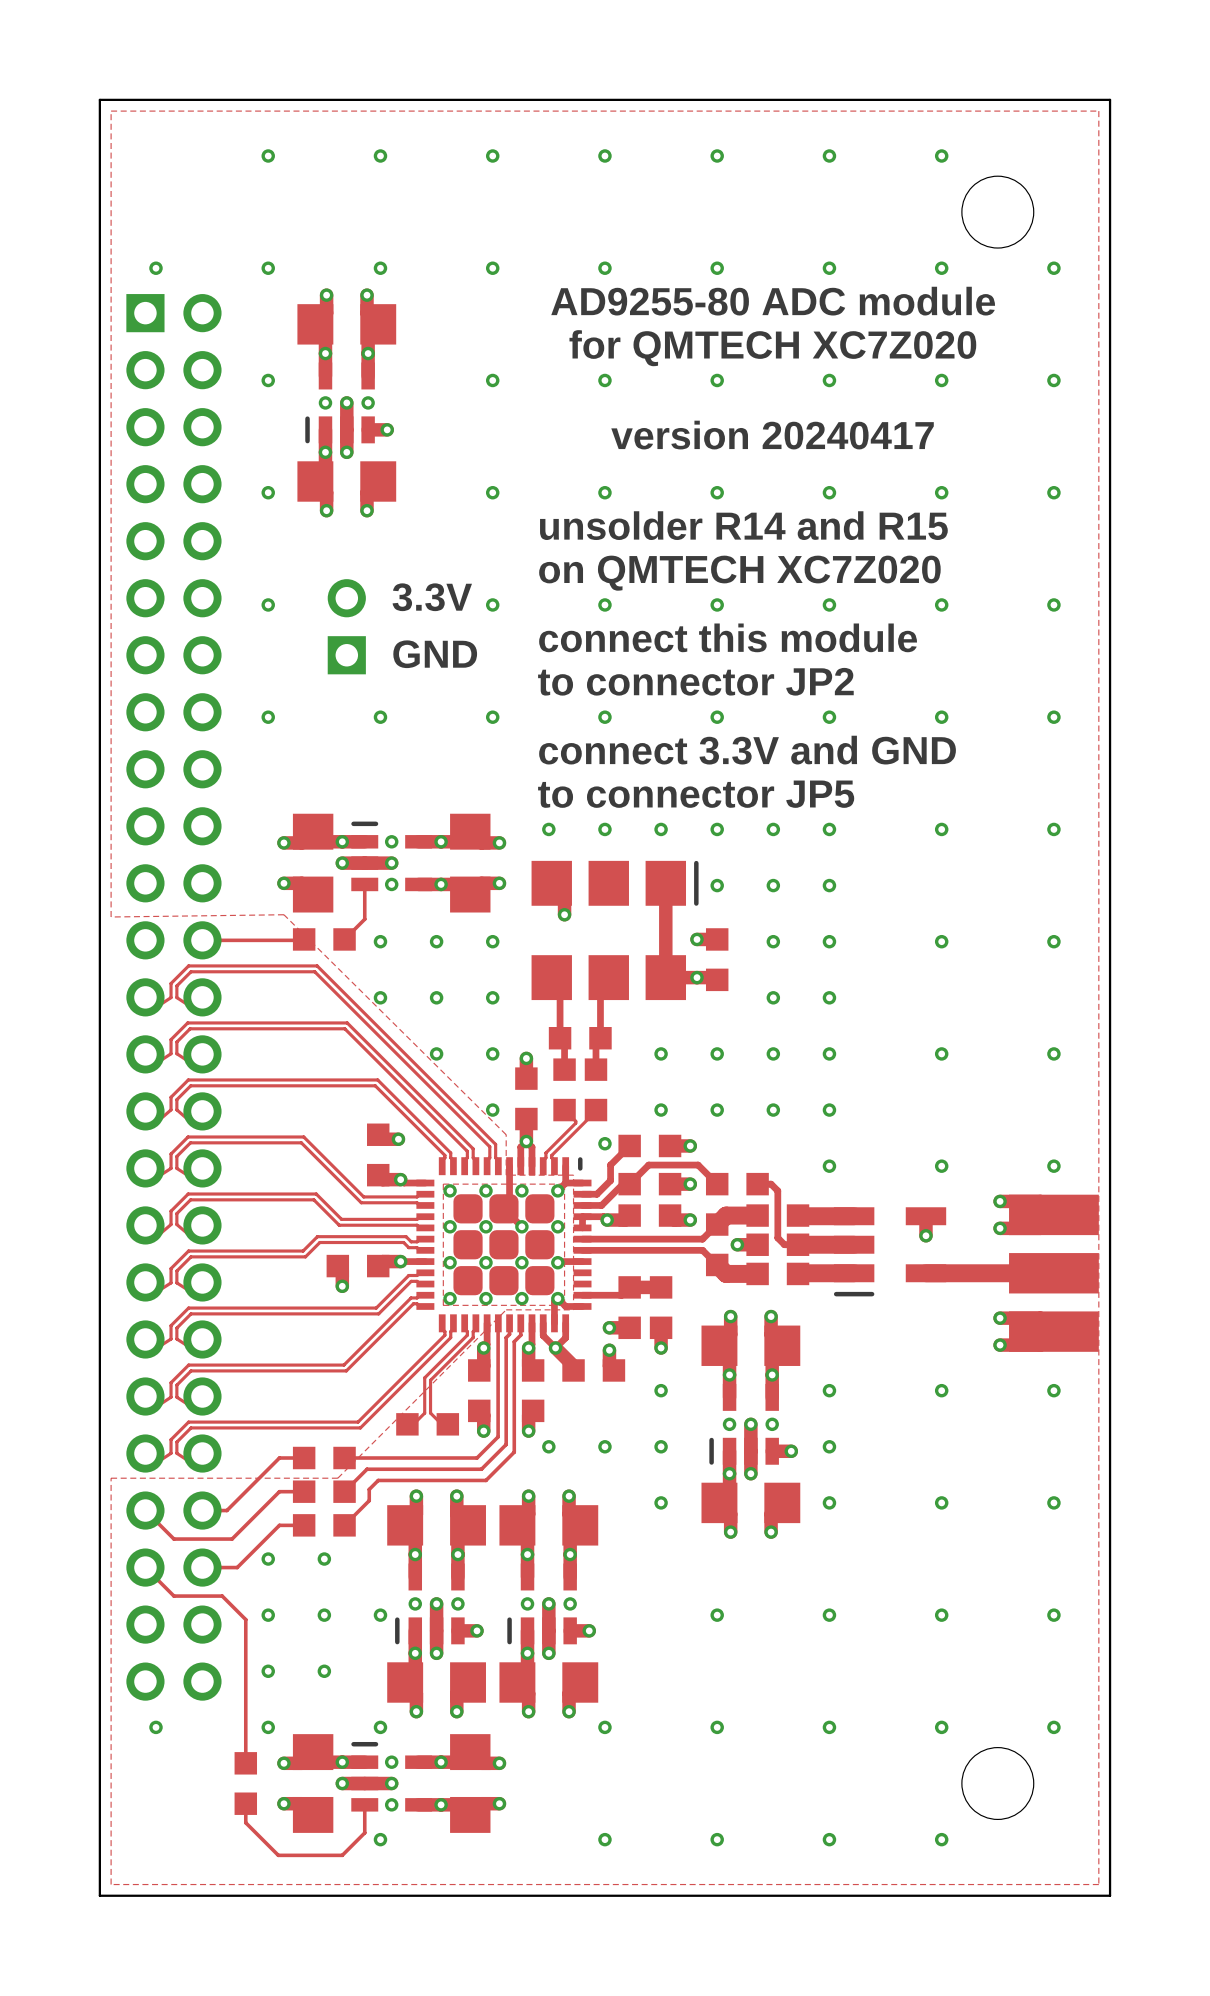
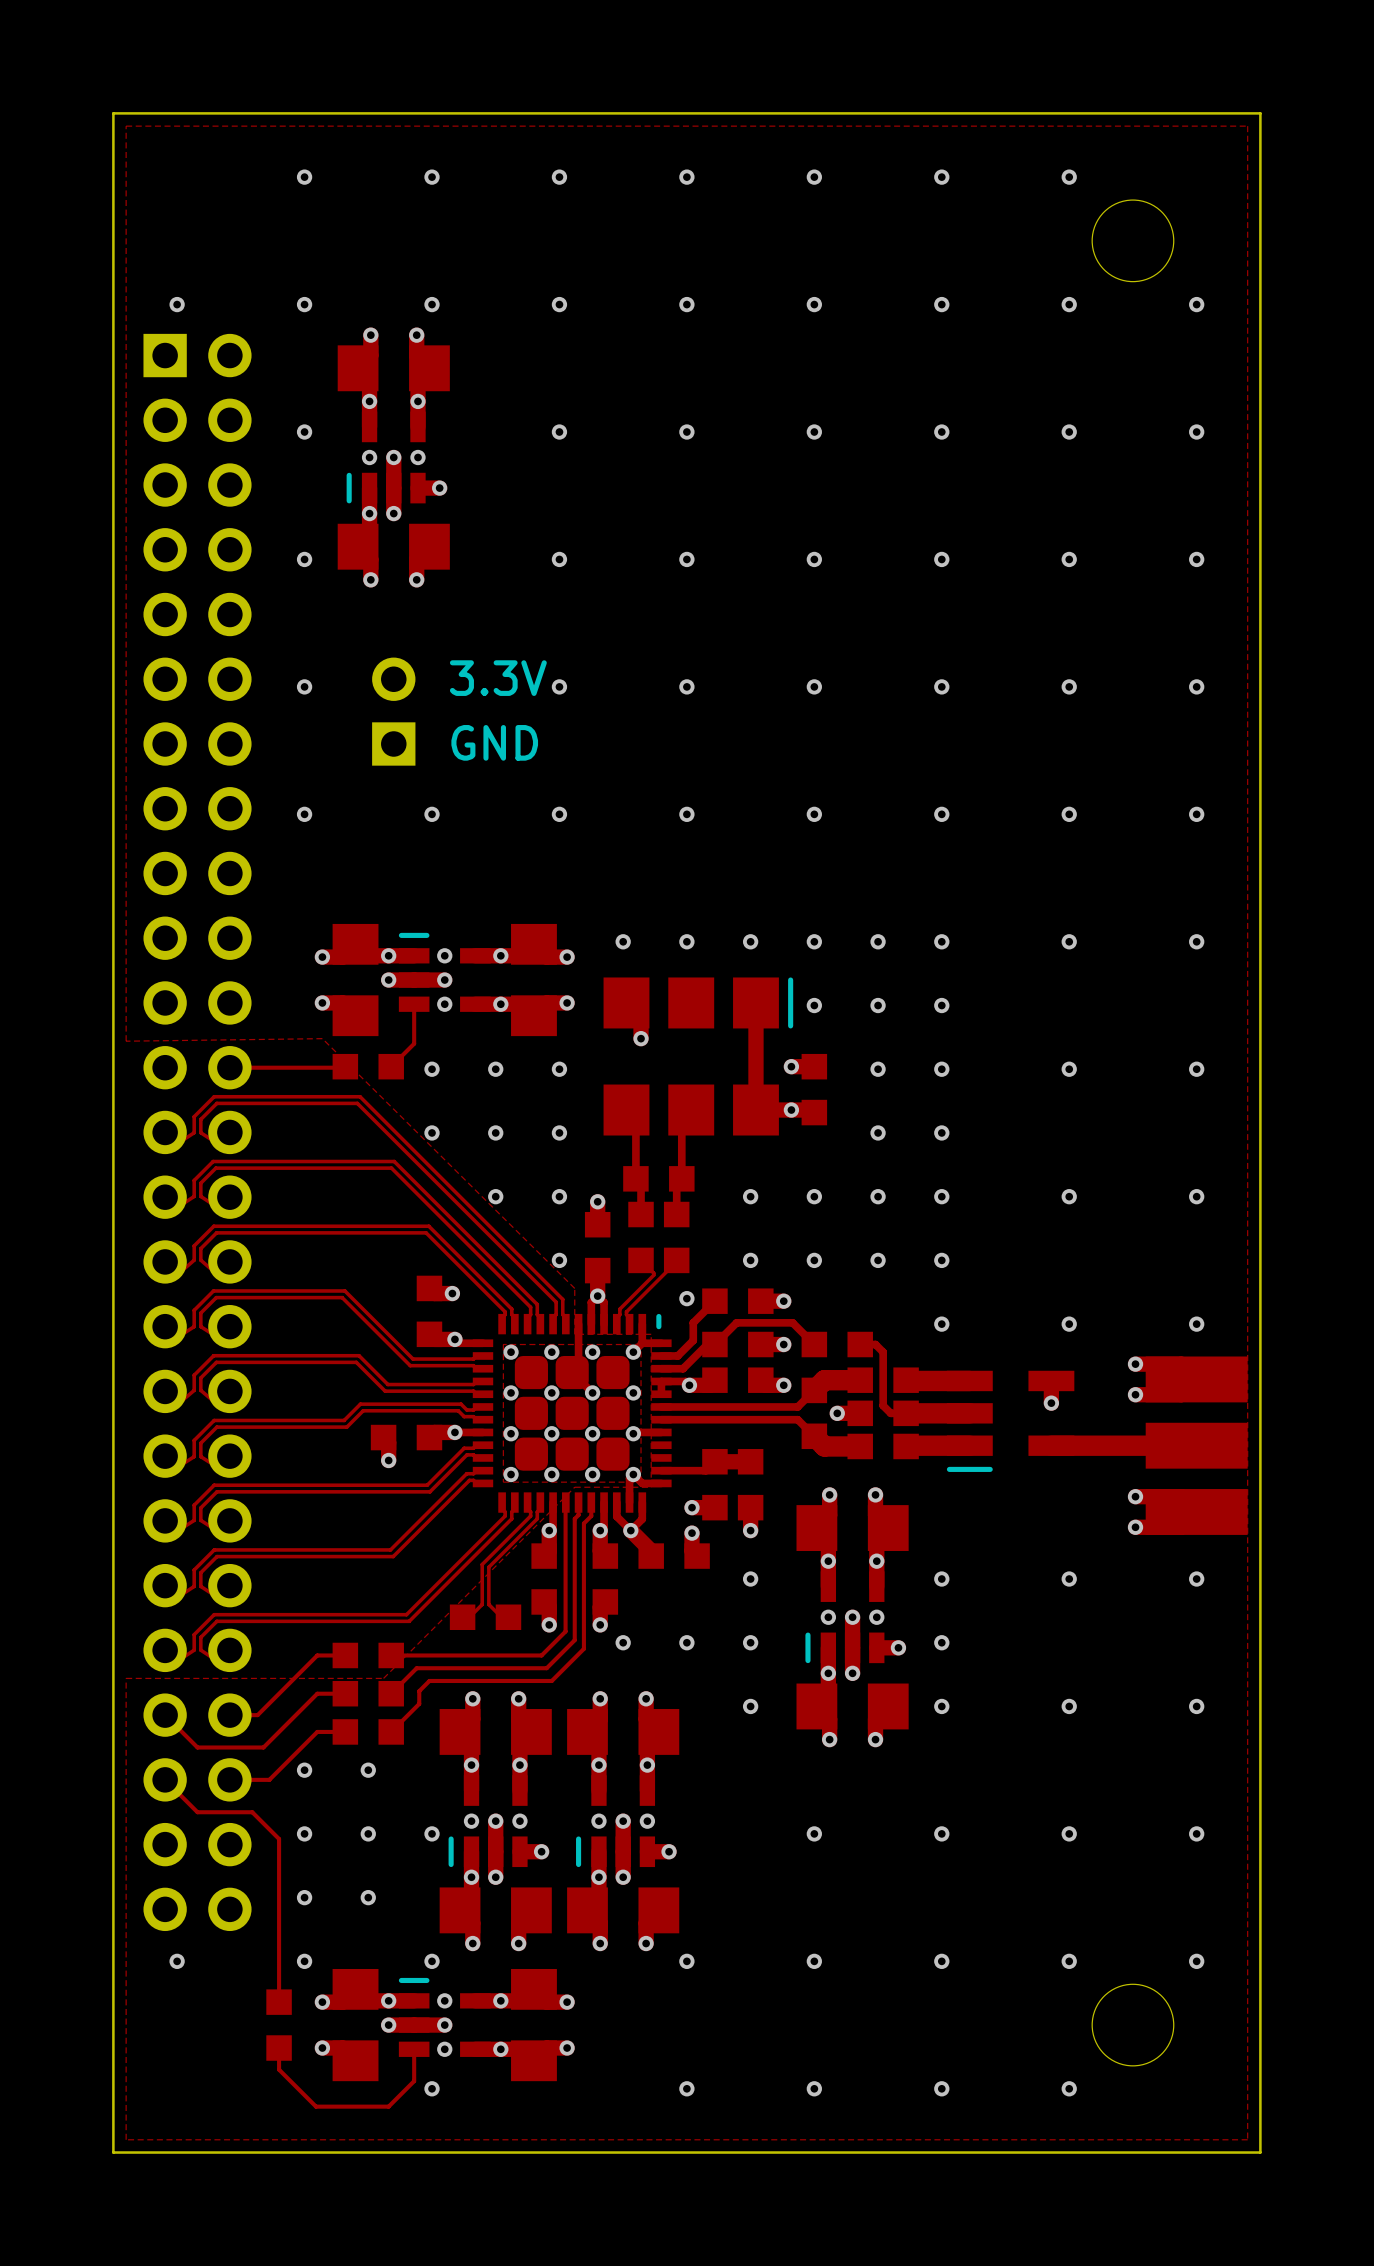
text: AD9255-80 ADC module (773, 301) -> none
text: for QMTECH XC7Z020 (772, 348) -> none
text: version 20240417 (772, 435) -> none
text: unsolder R14 and R15 (743, 525) -> none
text: on QMTECH XC7Z020 (739, 573) -> none
text: connect this module (728, 637) -> none
text: to connector JP2 (695, 681) -> none
text: connect 3.3V and GND (747, 750) -> none
text: to connector JP5 (696, 794) -> none

